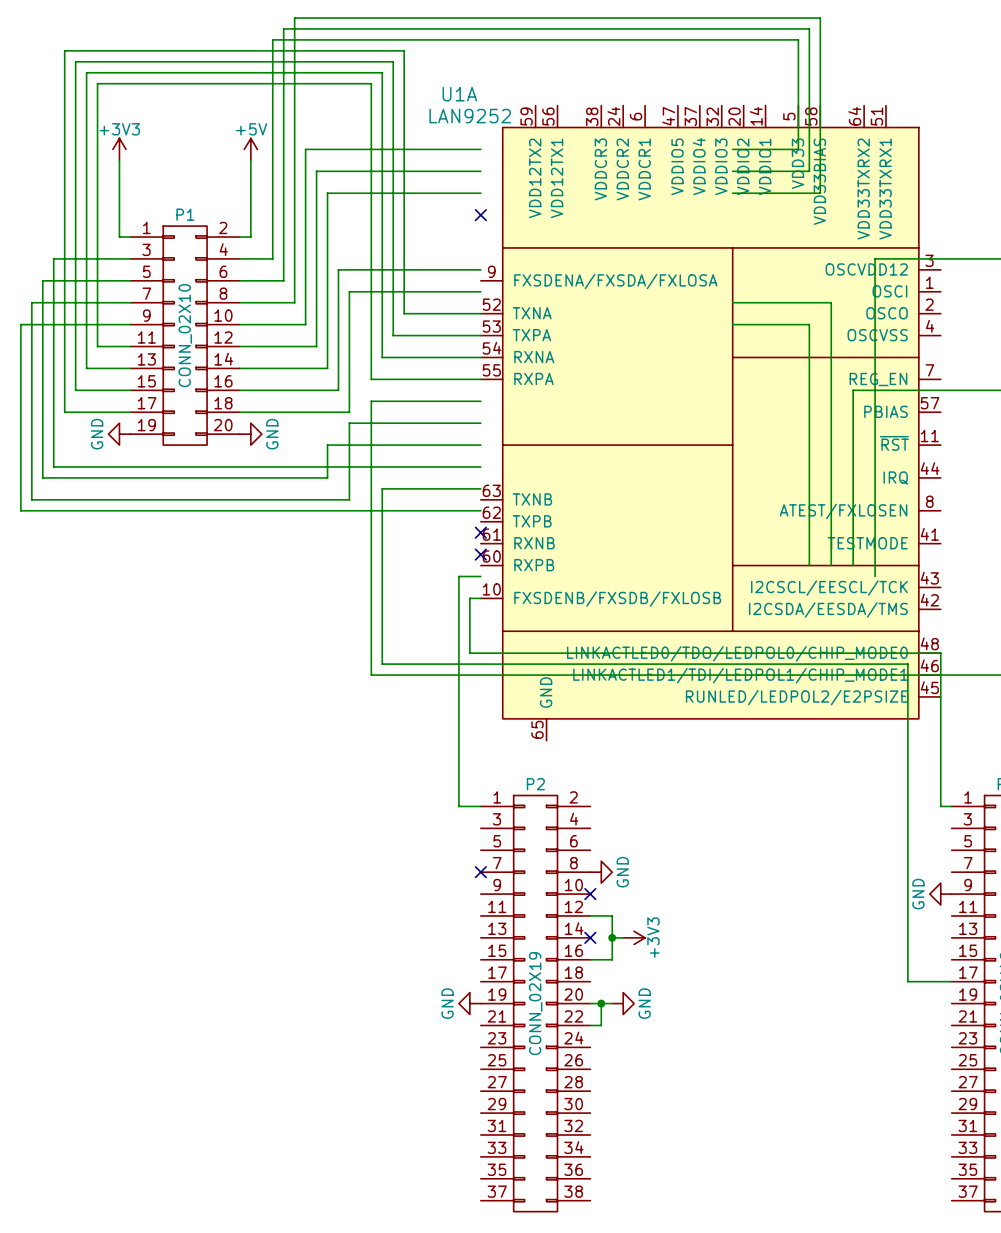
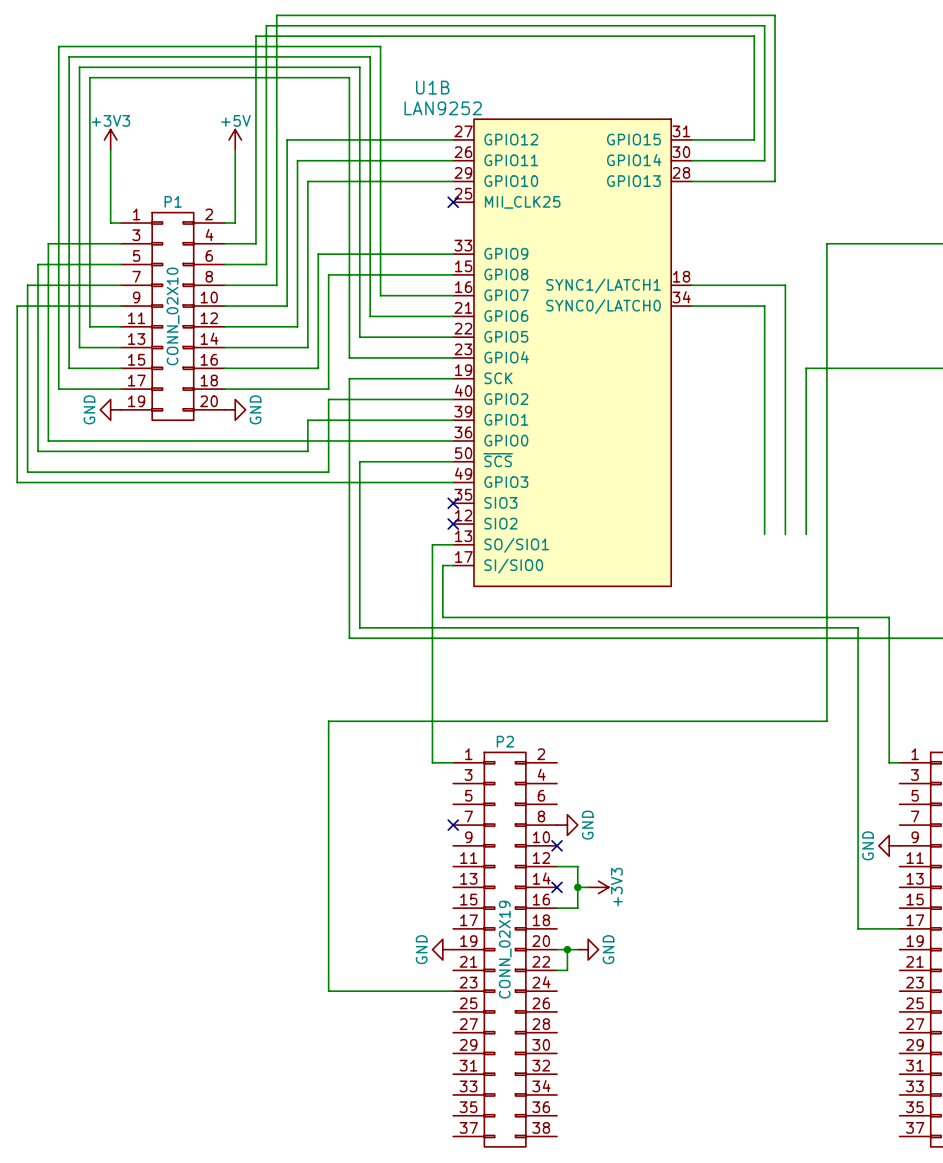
U1B: none -> LAN9252 (572, 352)
U1A: LAN9252 (710, 423) -> none
wire: none -> (826, 544) (826, 721) (328, 721) (328, 991) (453, 991)

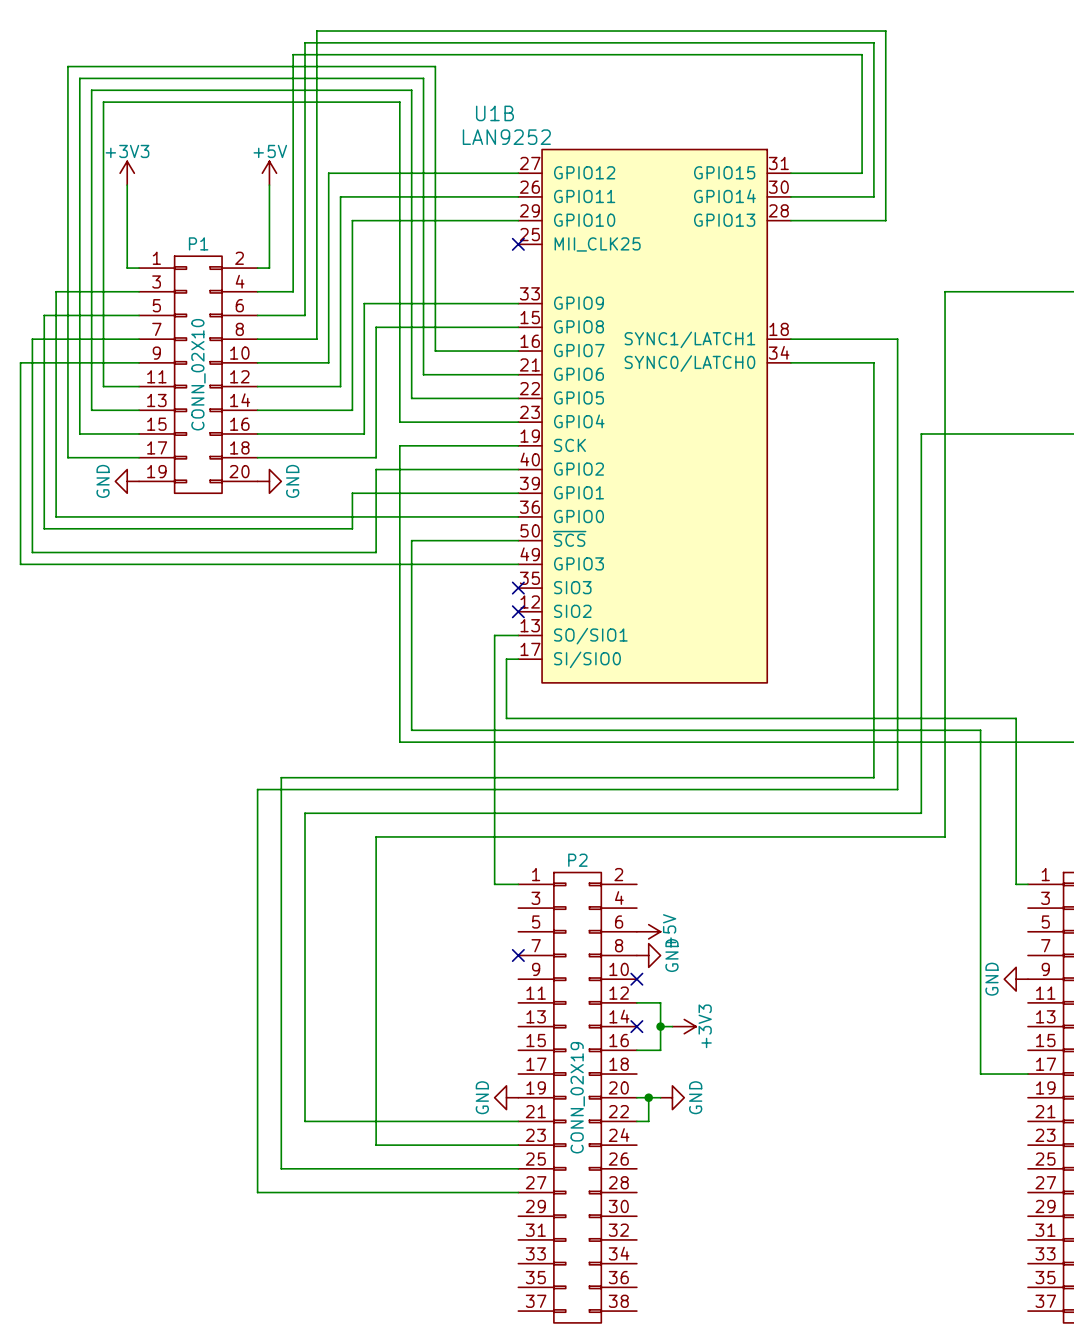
wire: none -> (873, 623) (873, 777) (281, 777) (281, 1168) (518, 1168)
wire: none -> (897, 623) (897, 789) (257, 789) (257, 1192) (518, 1192)
wire: none -> (921, 623) (921, 813) (305, 813) (305, 1121) (518, 1121)
power symbol: none -> +5V (648, 931)

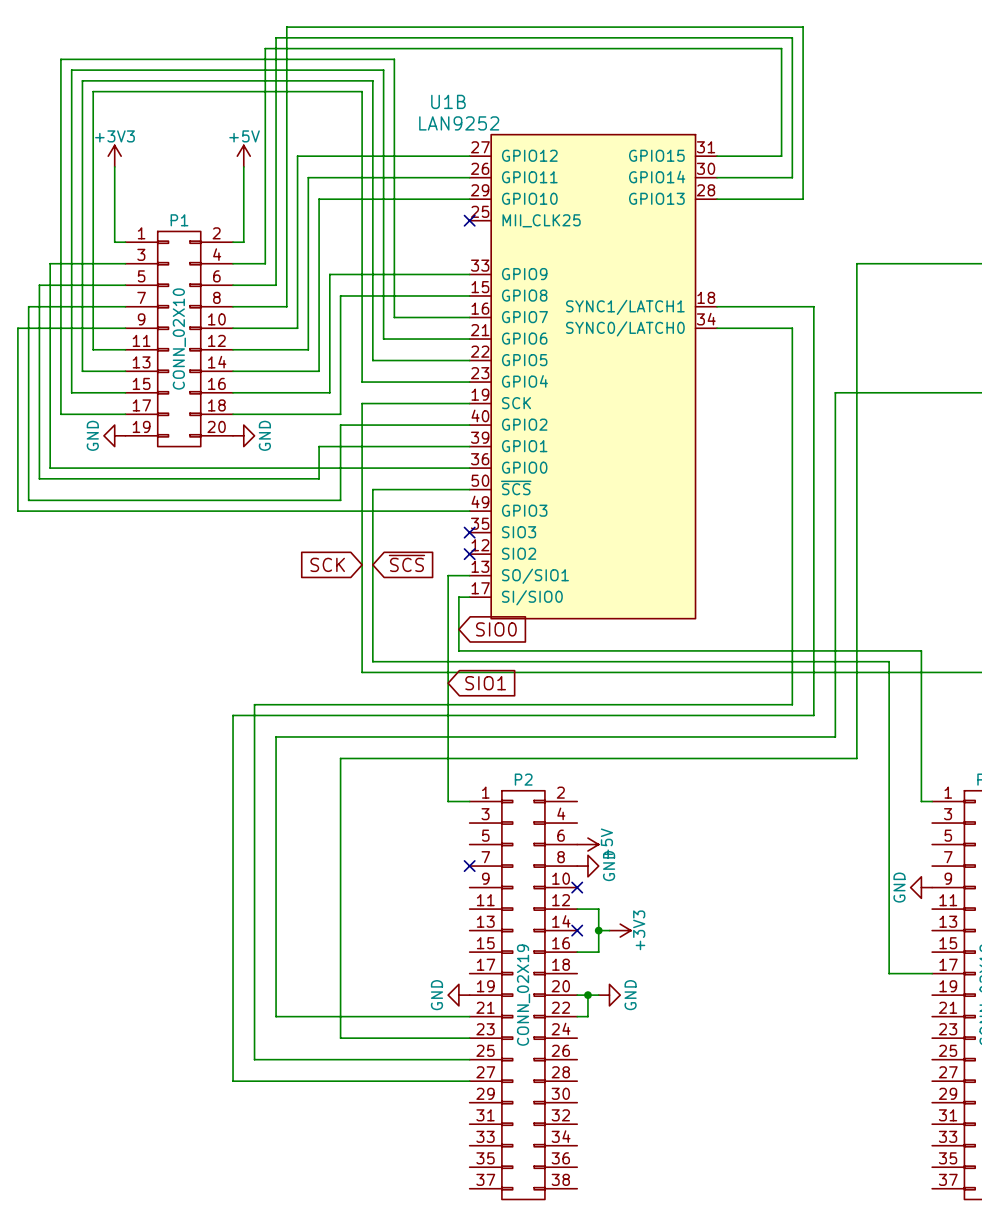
global label: none -> ~{SCS} (406, 563)
global label: none -> SCK (327, 564)
global label: none -> SIO0 (496, 629)
global label: none -> SIO1 (485, 683)

